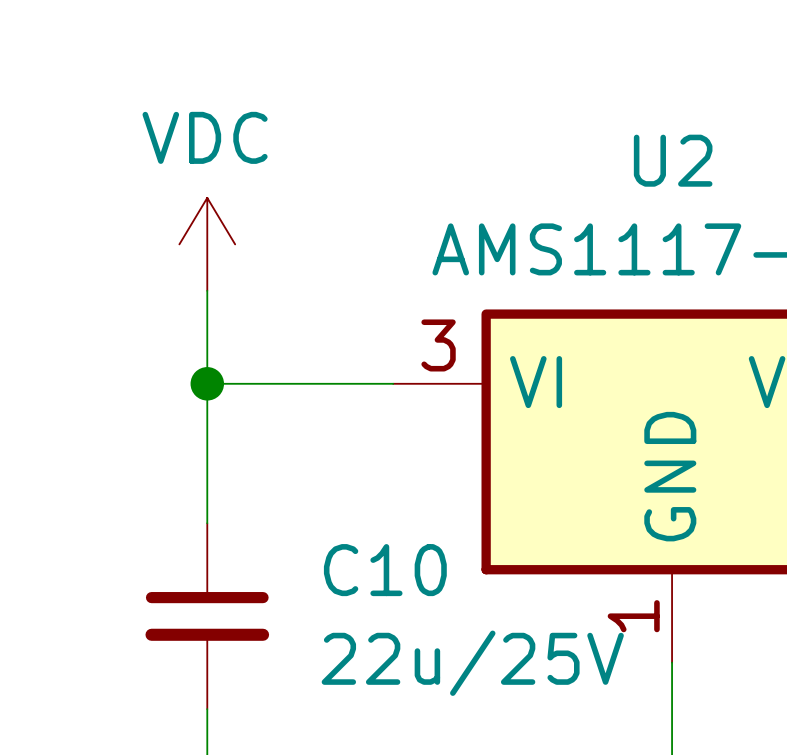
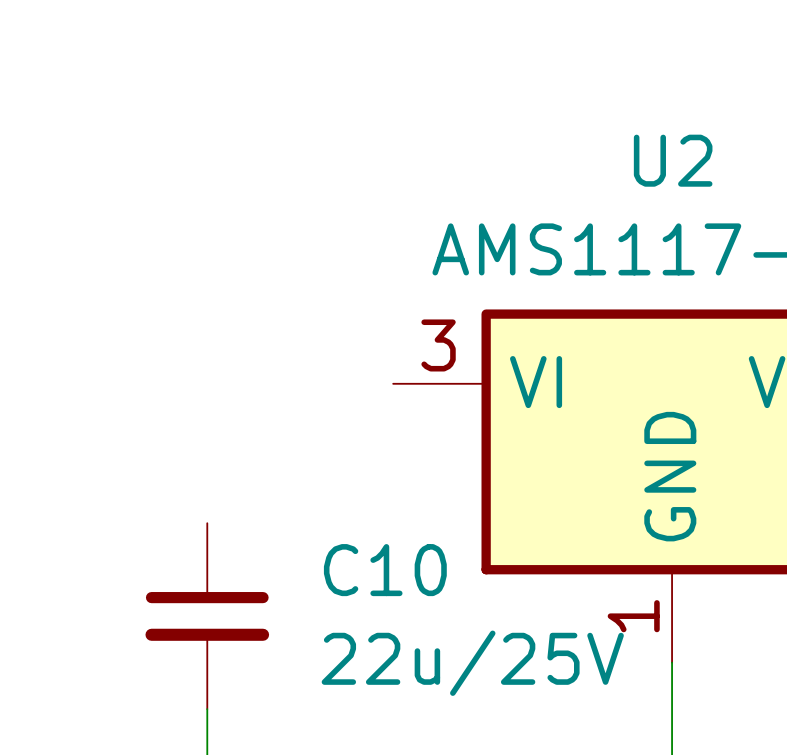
power symbol: VDC (207, 244) -> none
wire: (207, 290) (207, 523) -> none
wire: (207, 383) (393, 383) -> none
junction: (207, 383) -> none

